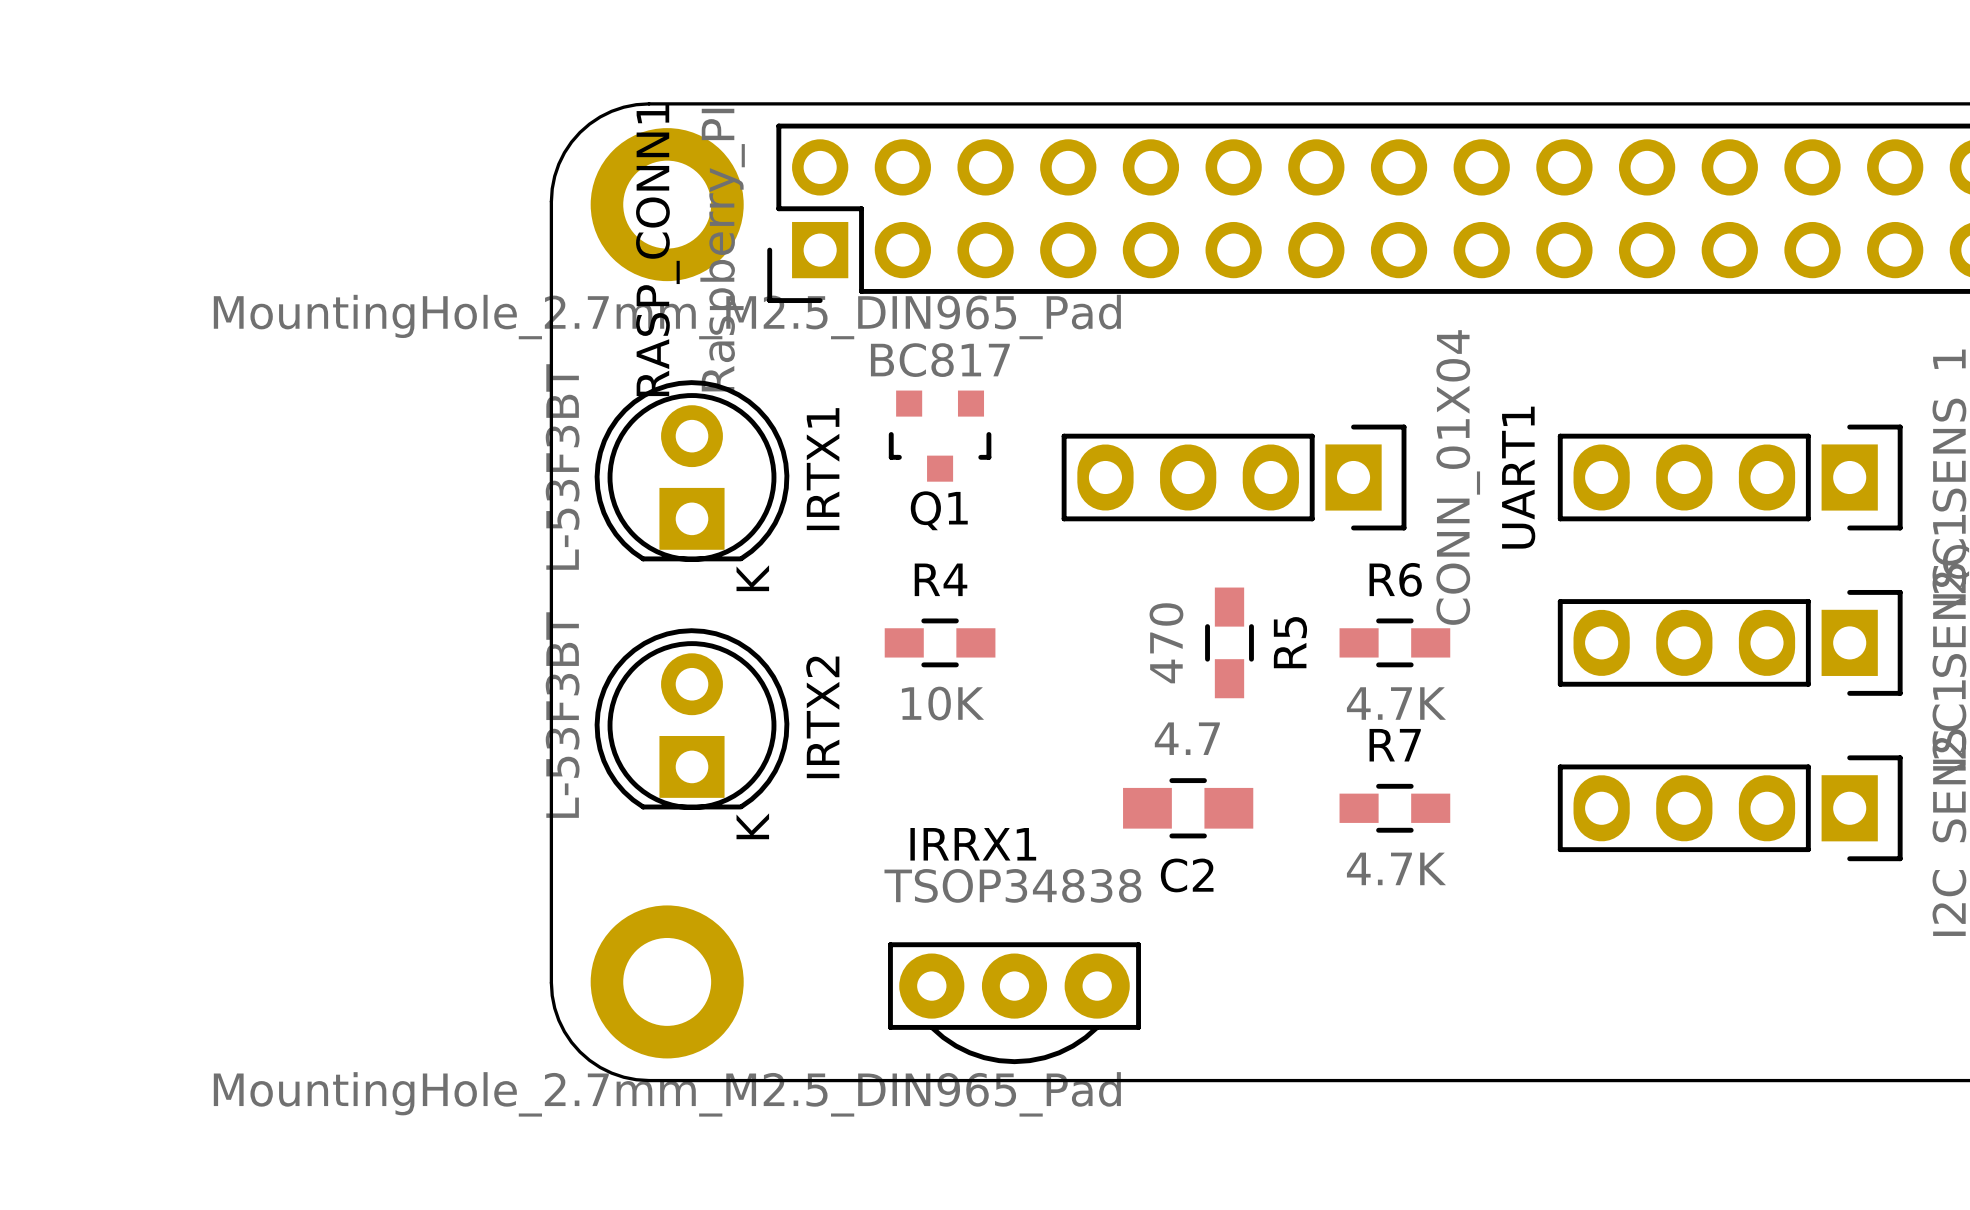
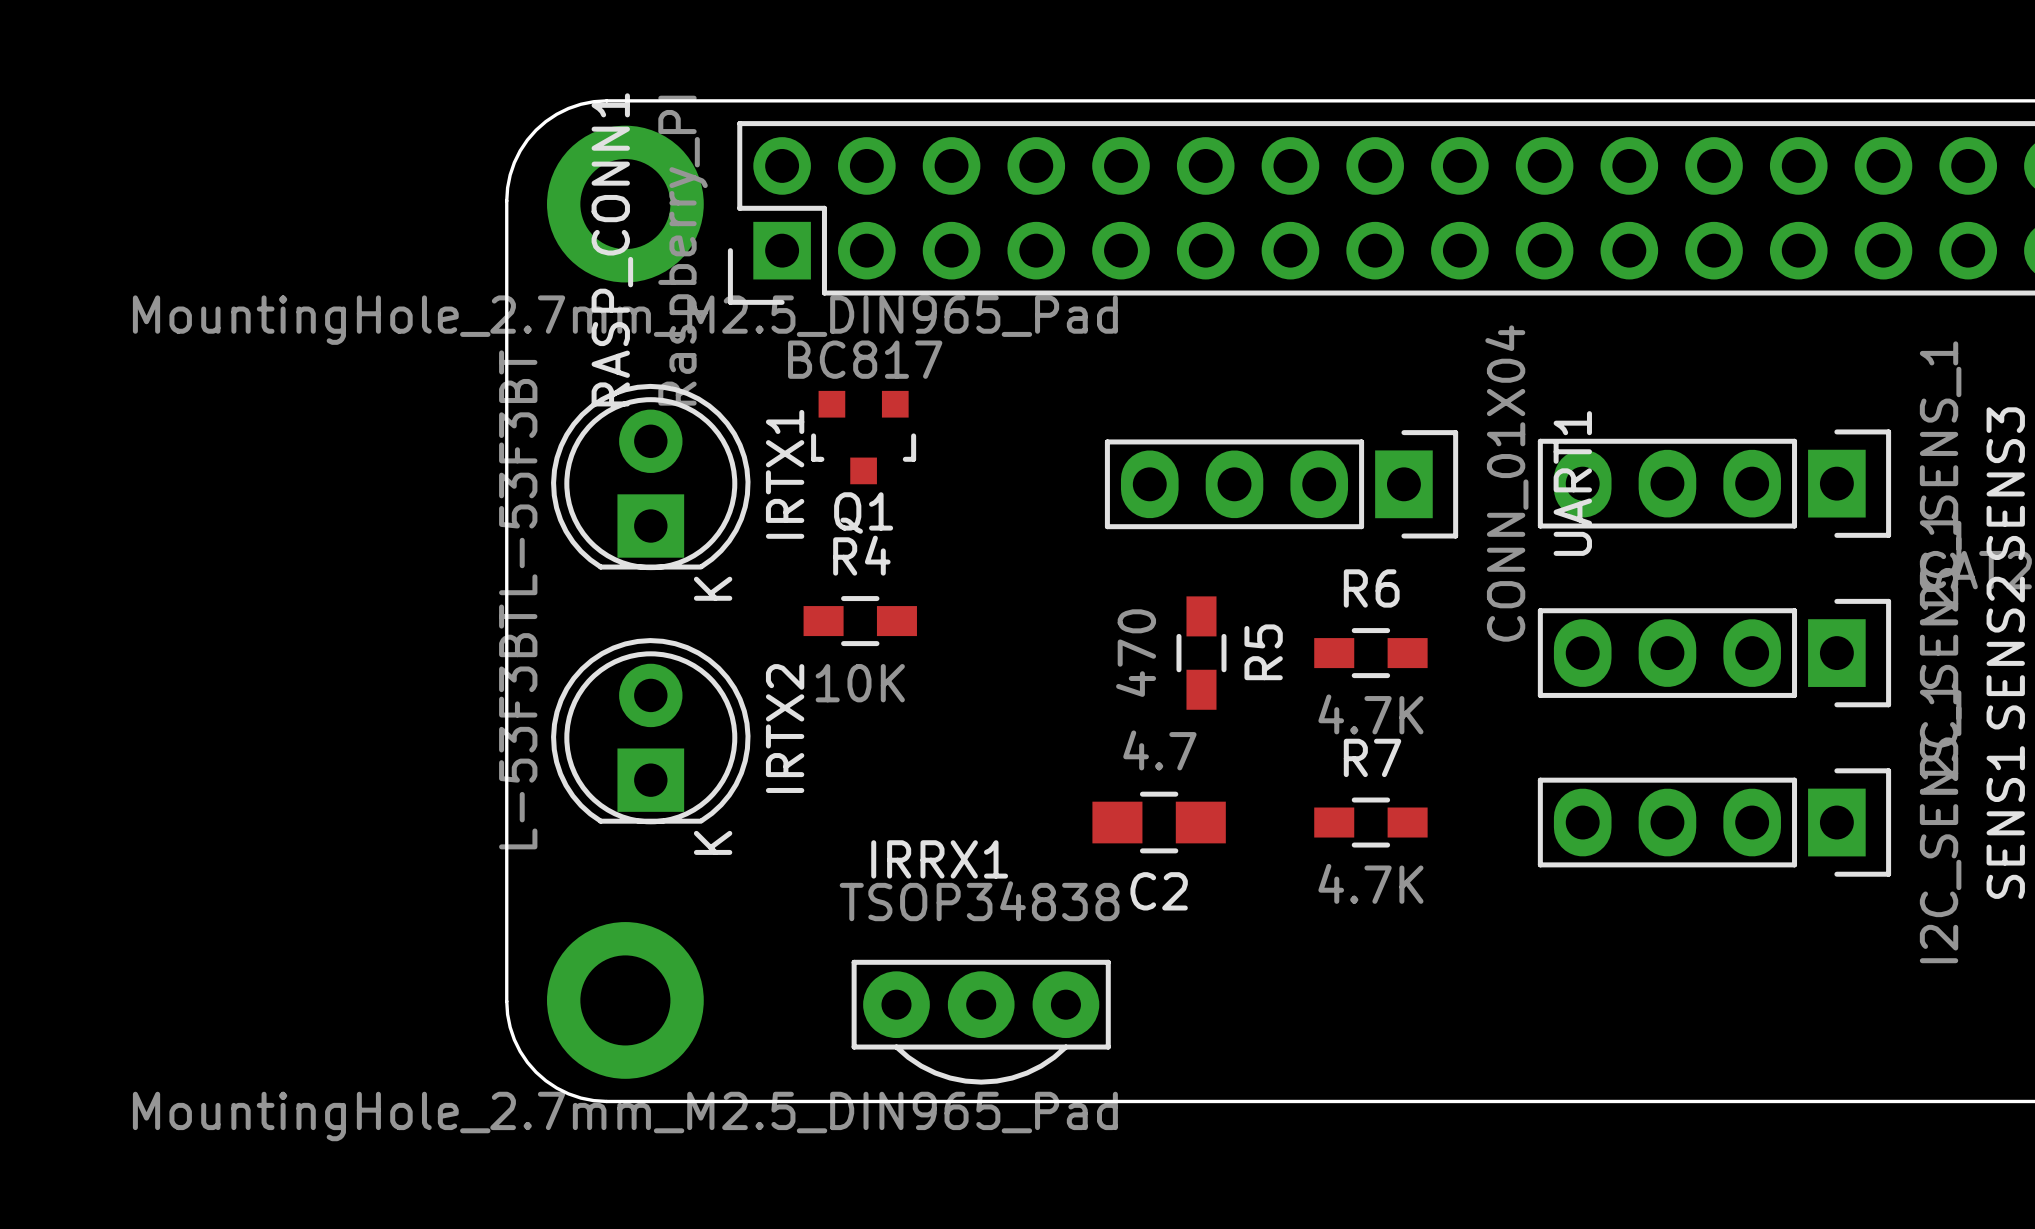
Q1 position: (940, 436) -> (863, 437)
UART1 position: (1234, 477) -> (1281, 484)
R4 position: (940, 642) -> (860, 621)

